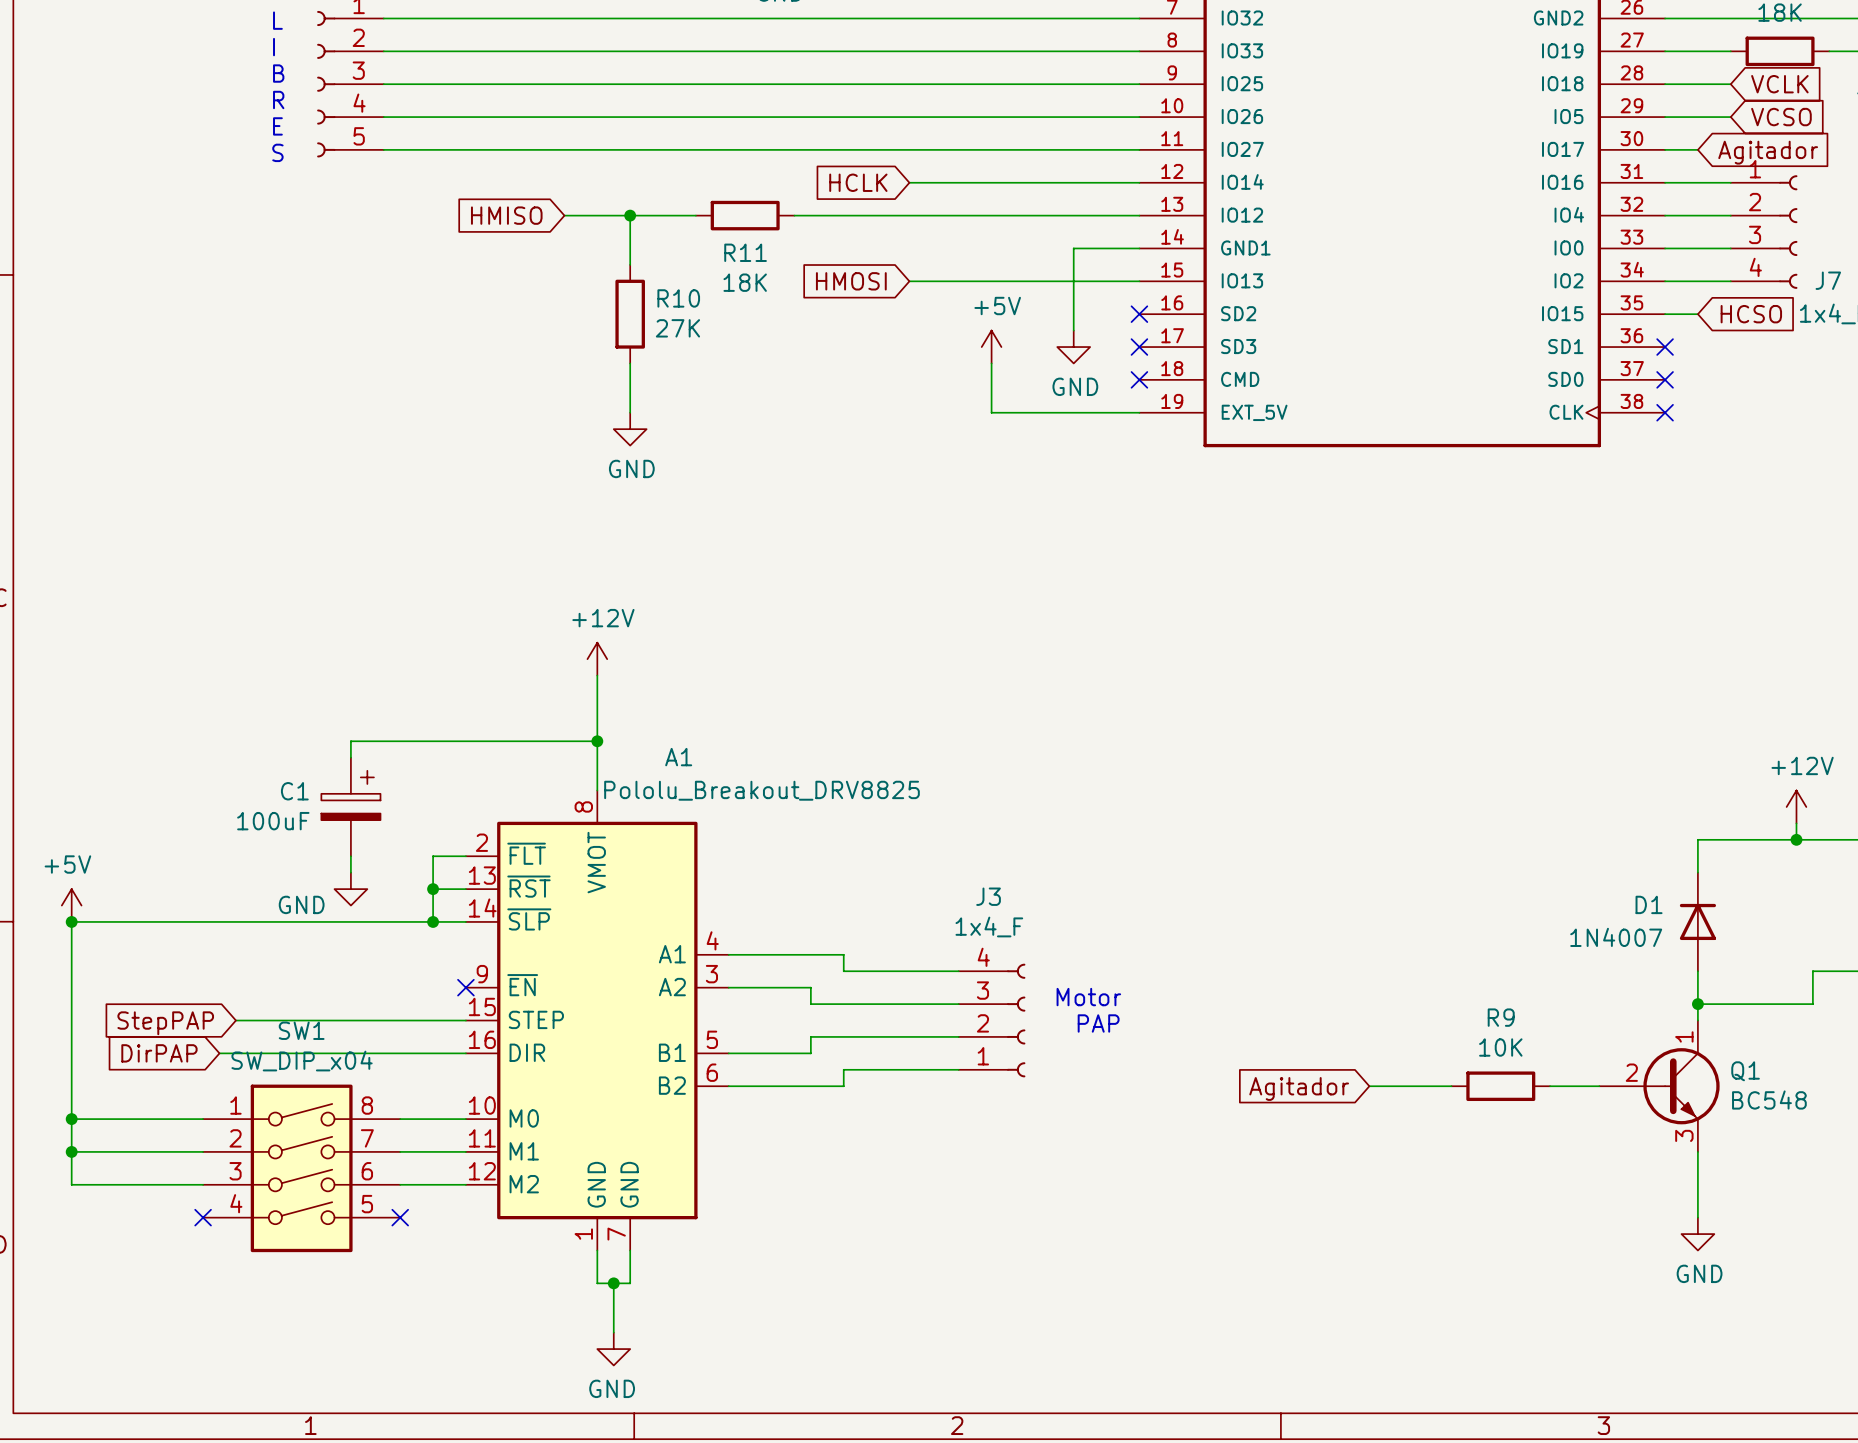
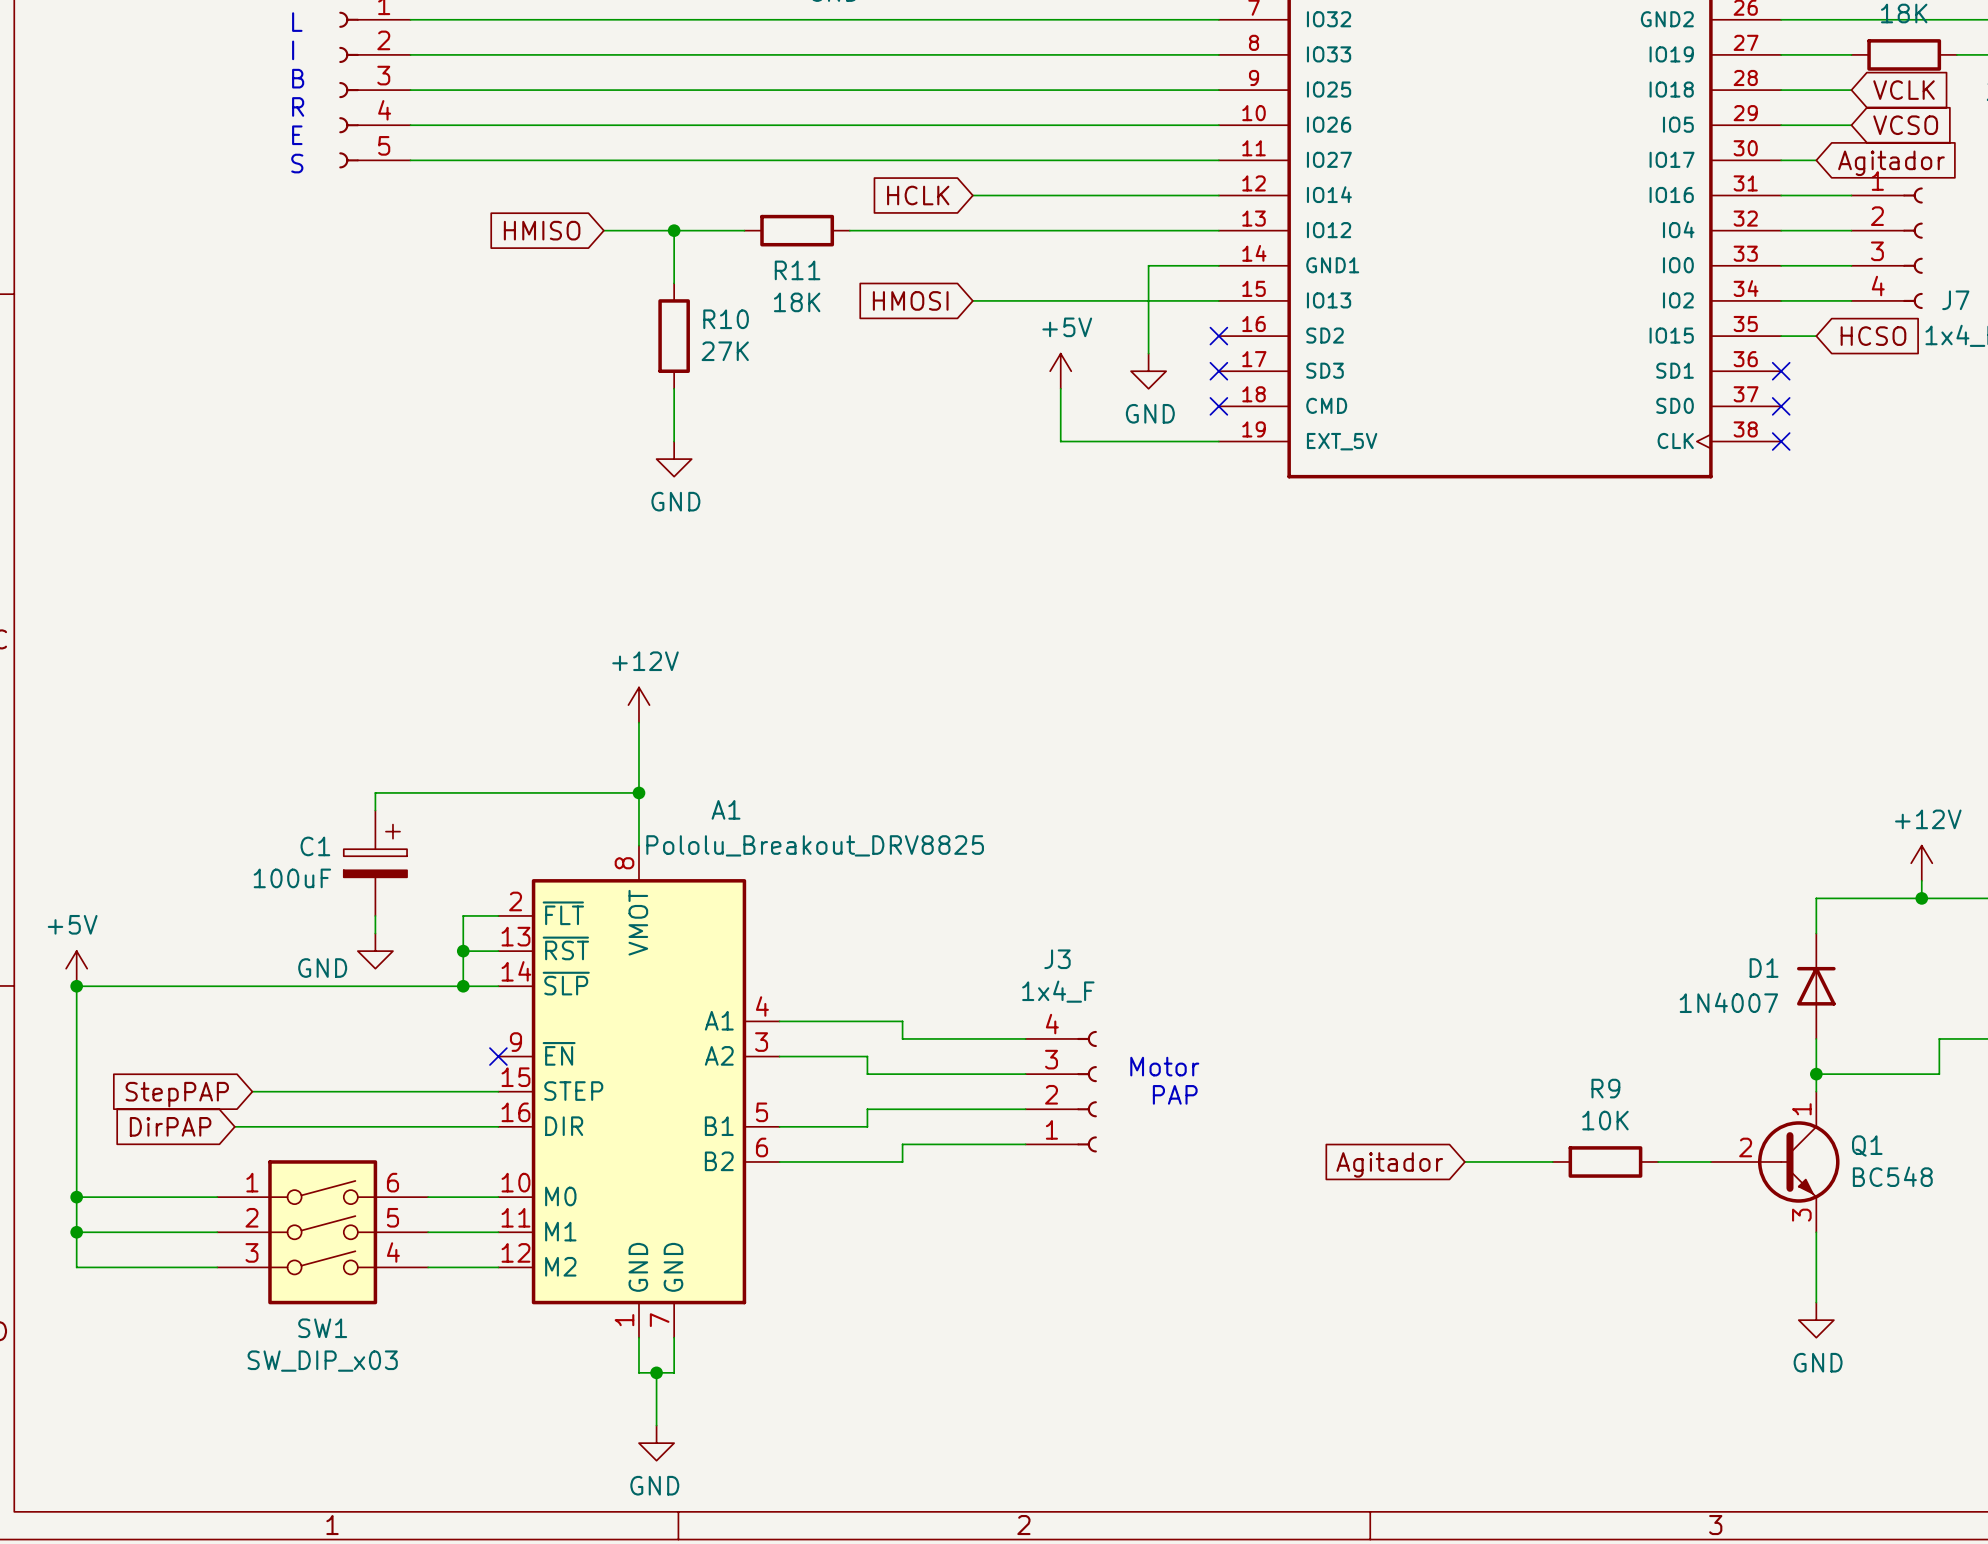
SW1 name position: SW1 (301, 1030) -> SW1 (322, 1328)
SW1 value: SW_DIP_x04 (302, 1061) -> SW_DIP_x03 (322, 1361)
SW1 symbol: [203, 1084, 401, 1253] -> [217, 1160, 429, 1305]
no-connect mark: (203, 1217) -> none
no-connect mark: (400, 1217) -> none

